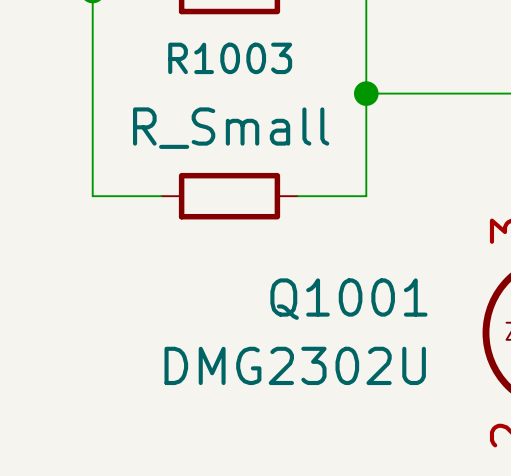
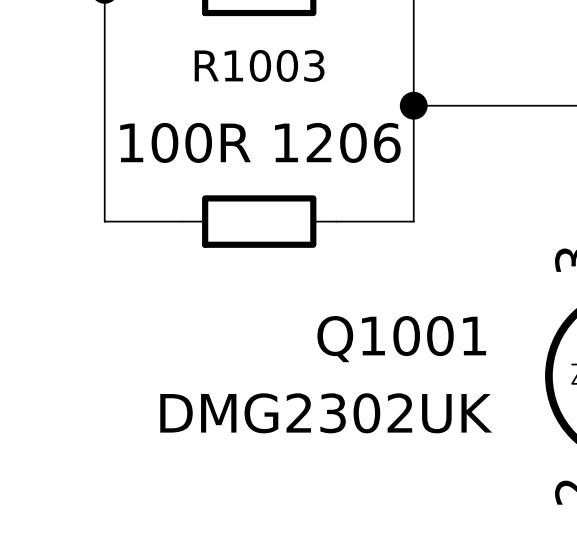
R1003 value: R_Small (231, 128) -> 100R 1206 (260, 142)
Q1001 value: DMG2302U (295, 365) -> DMG2302UK (326, 413)

